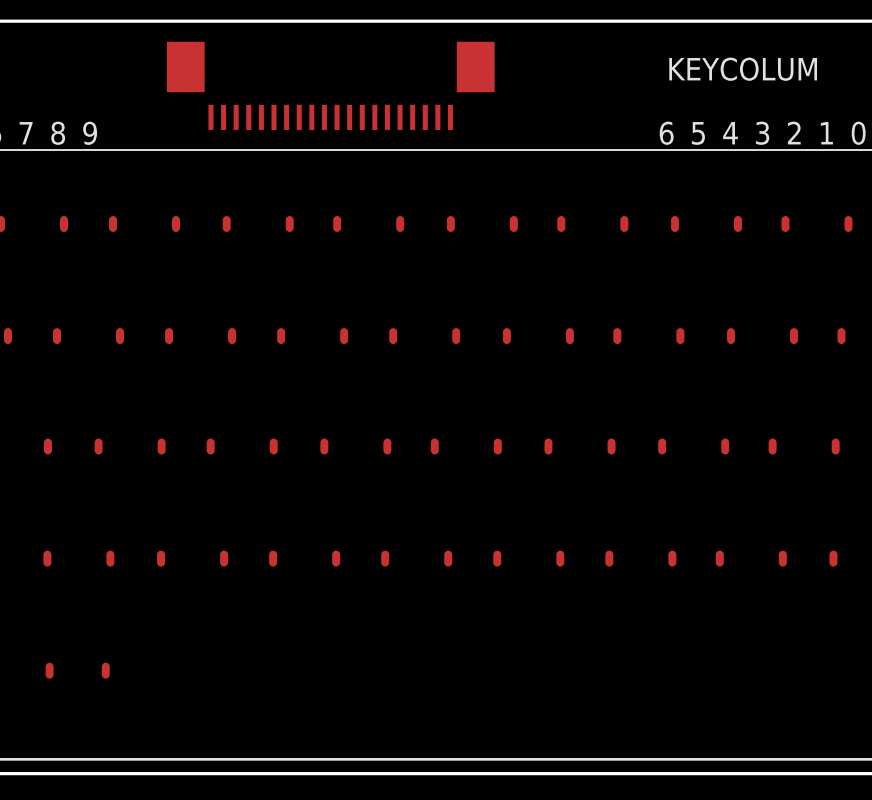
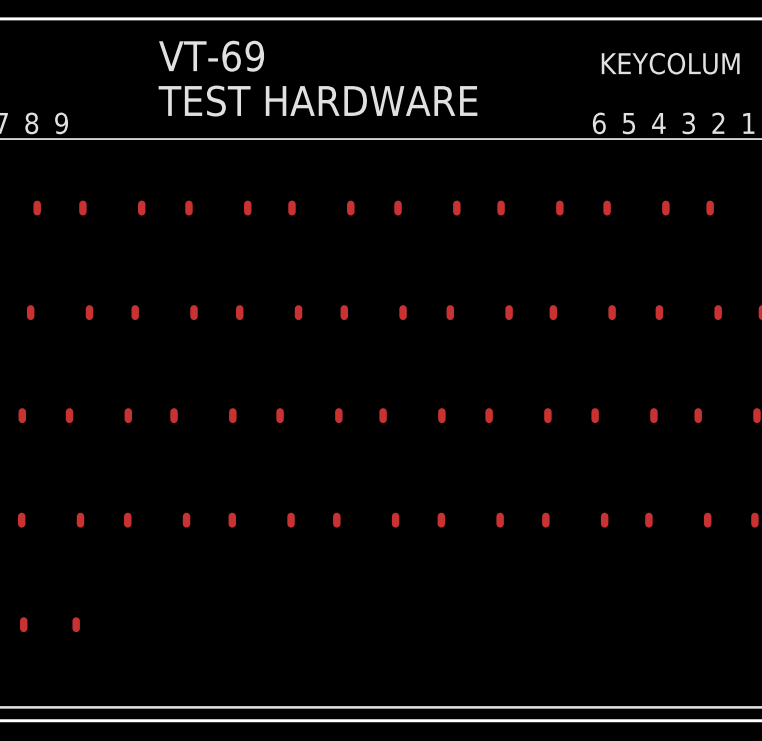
text: none -> VT-69 (211, 56)
part: (330, 85) -> none
text: none -> TEST HARDWARE (317, 101)

